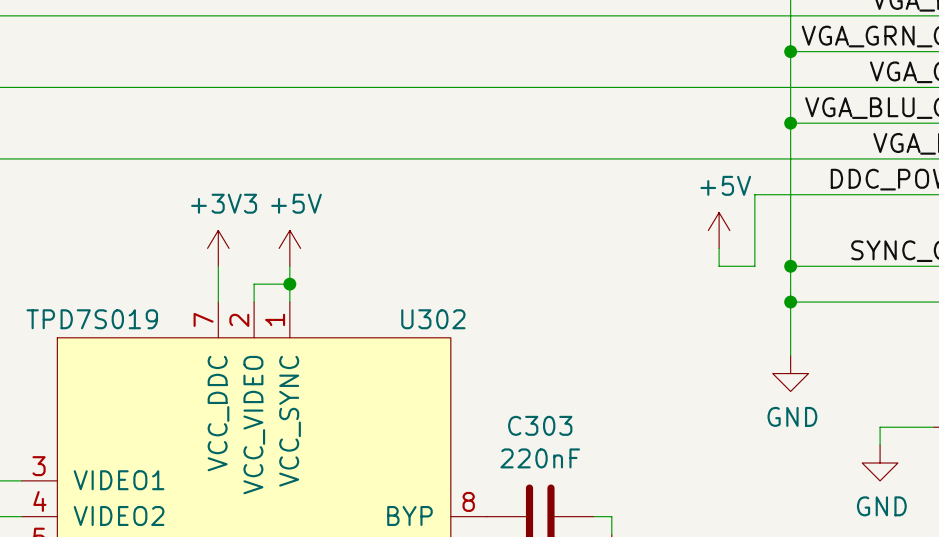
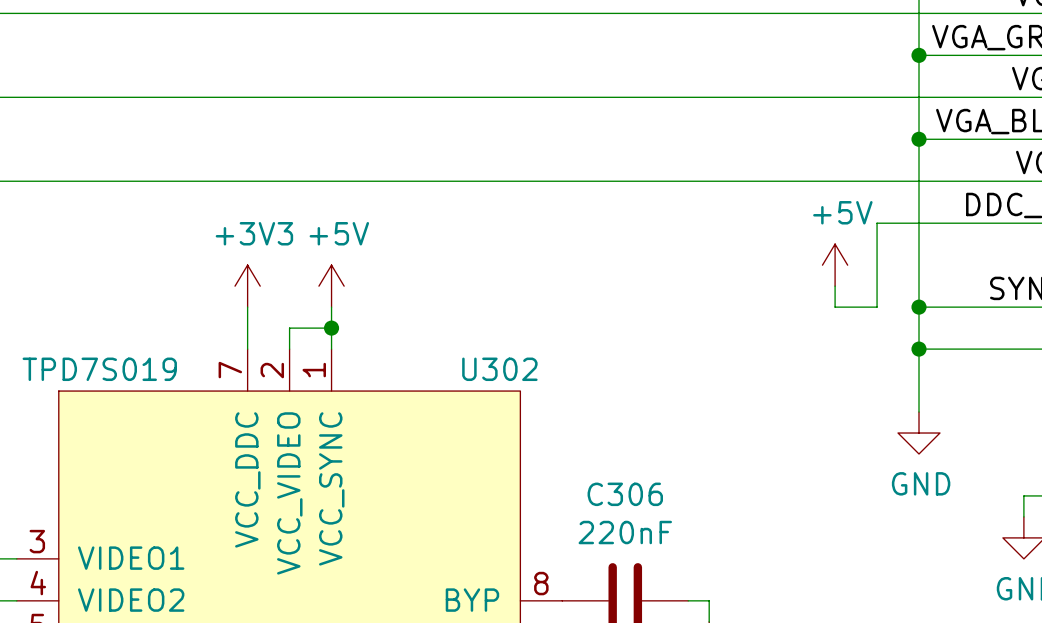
C303 name: C303 (540, 425) -> C306 (625, 494)

